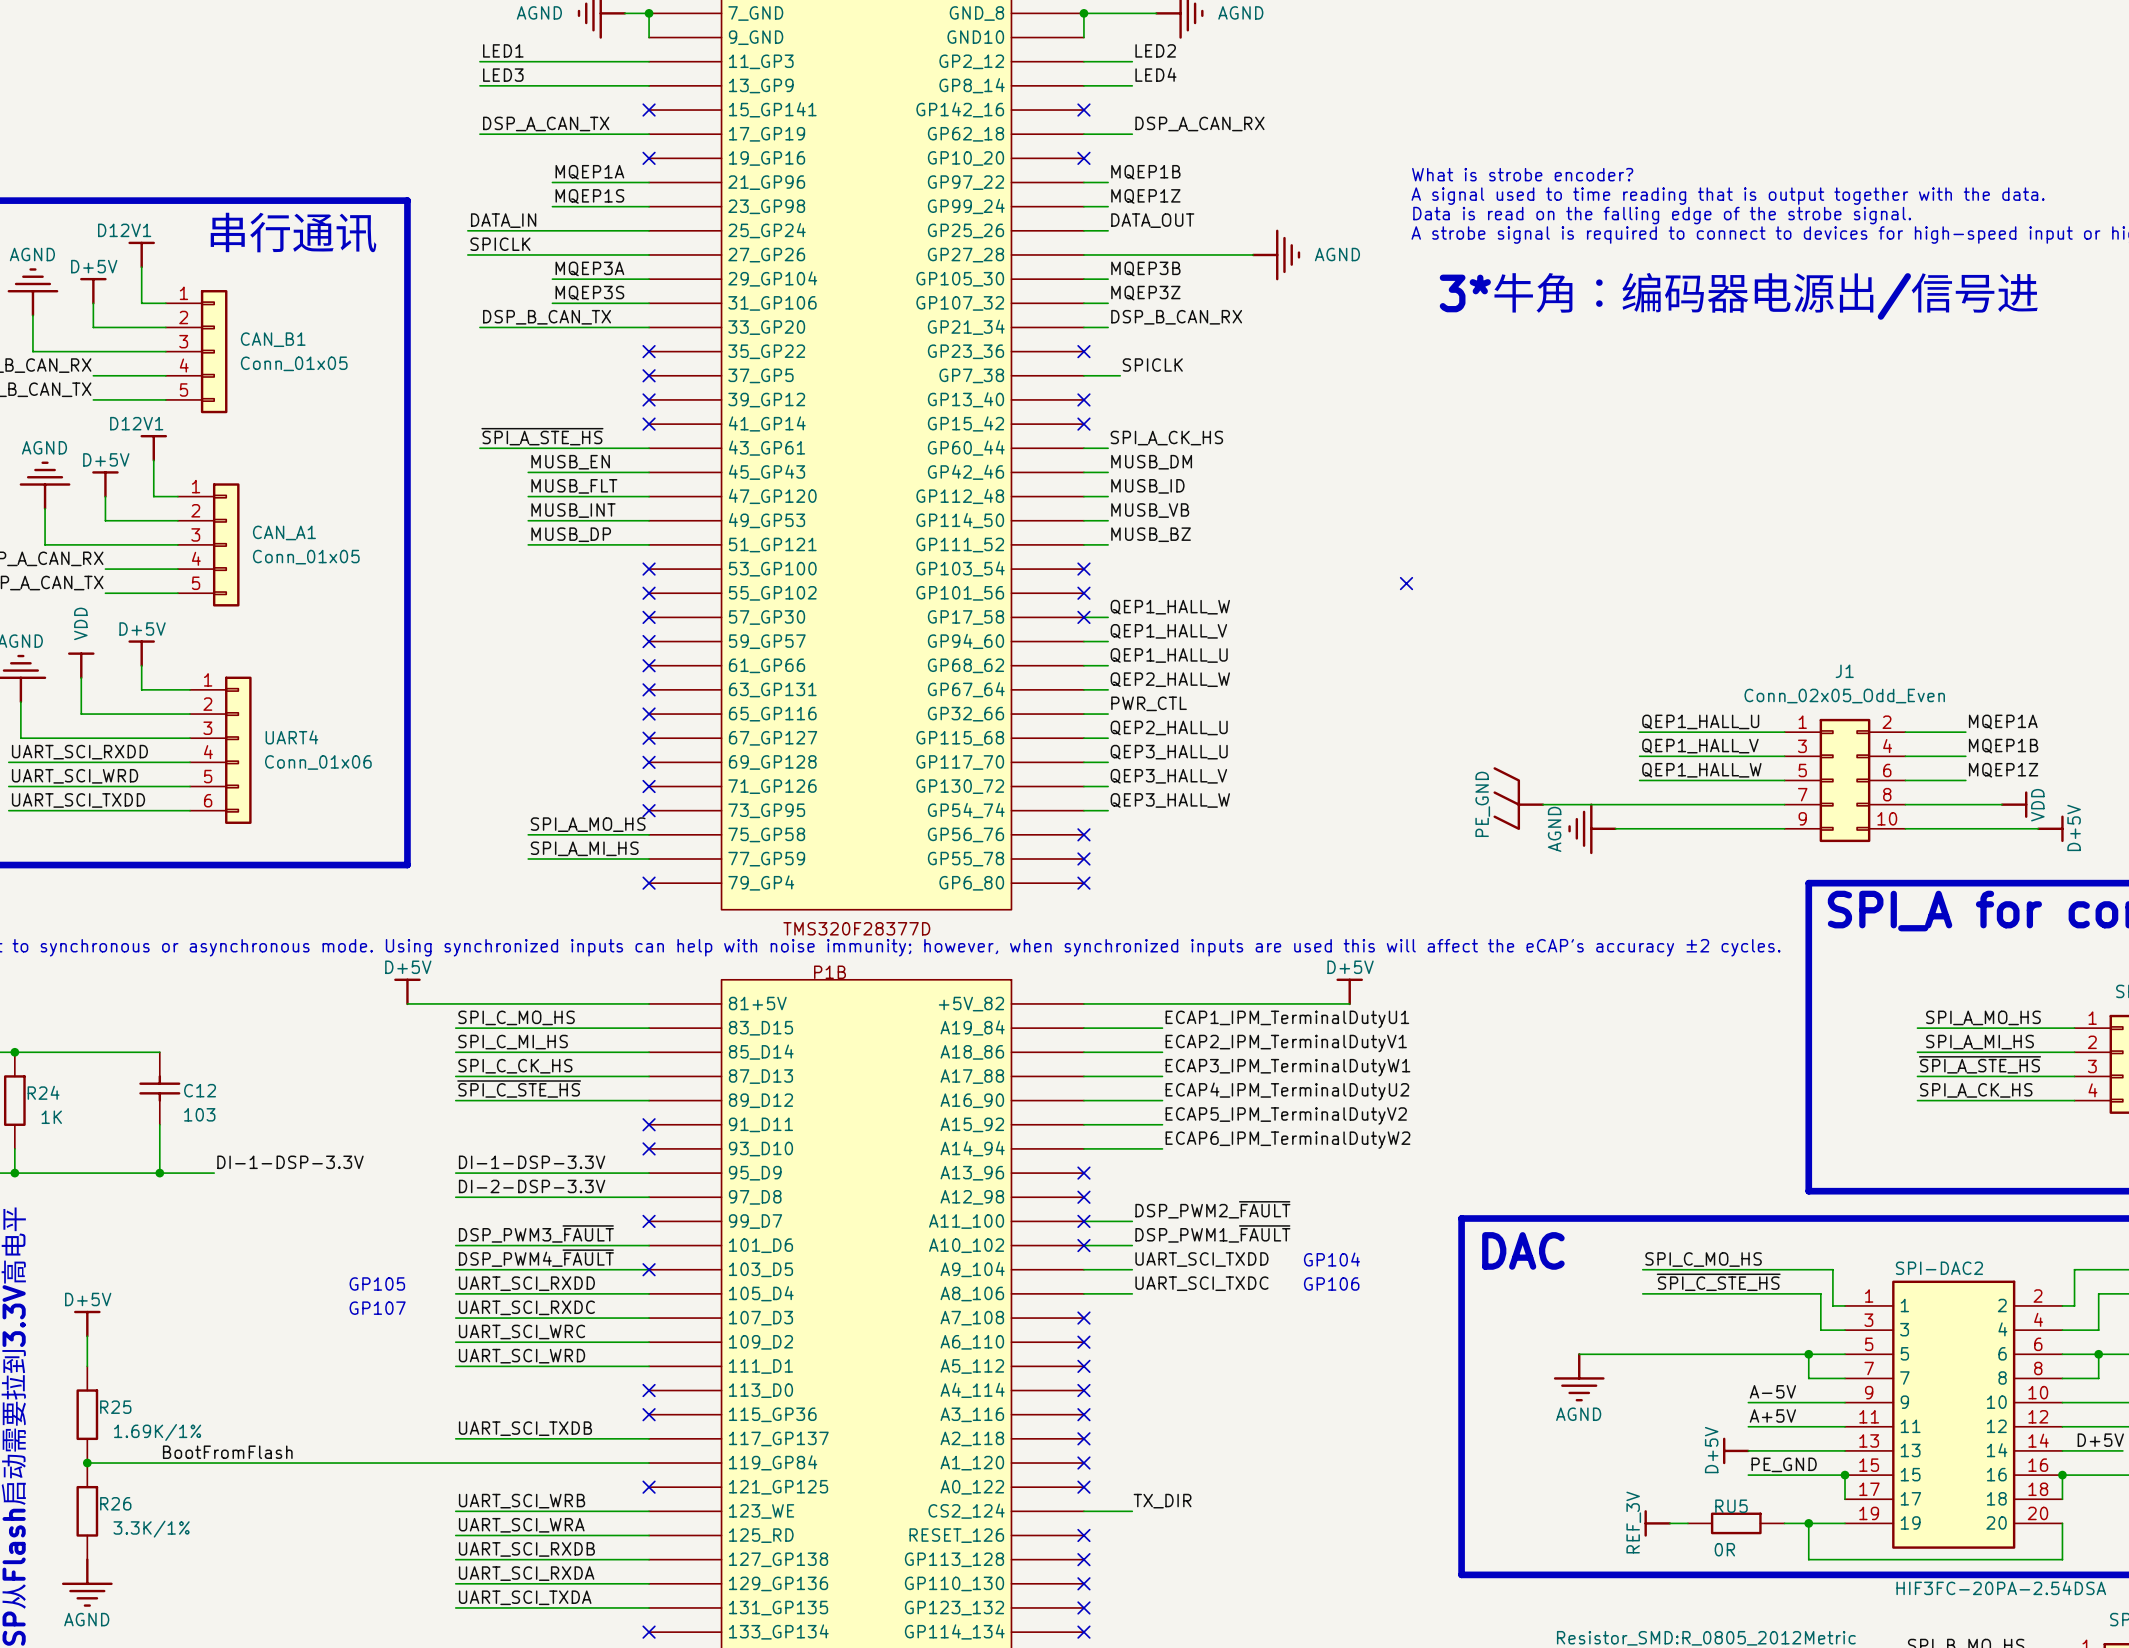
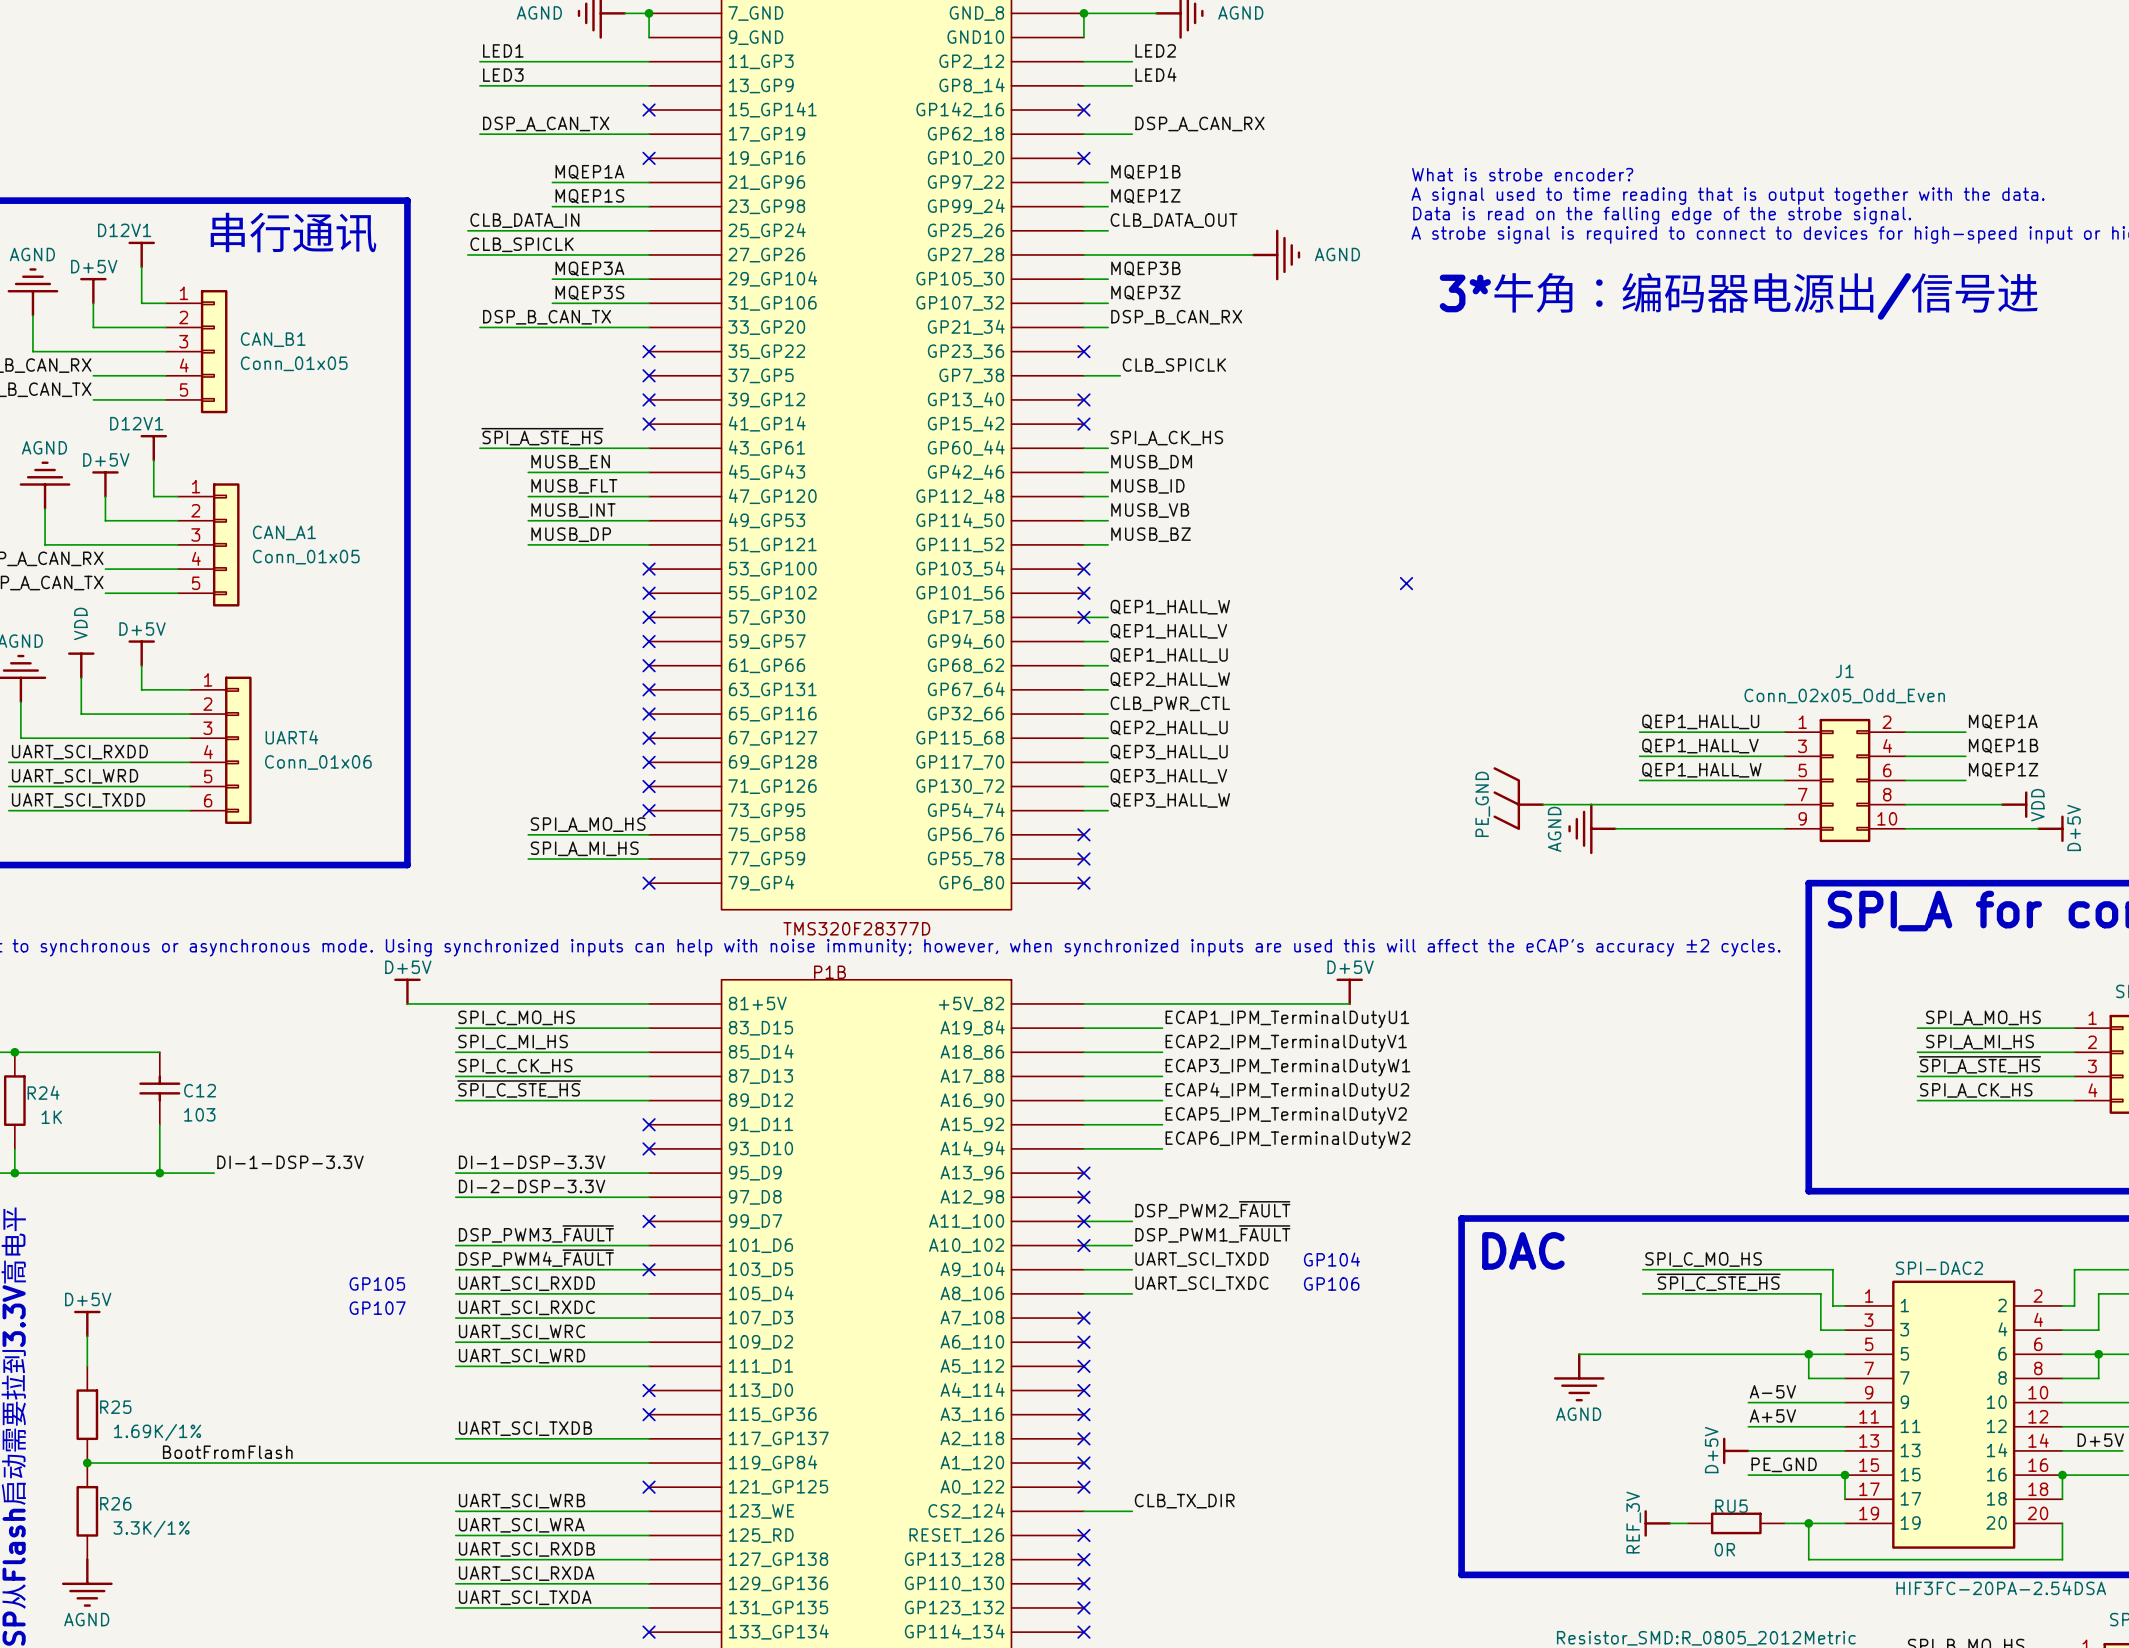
label: DATA_IN (503, 220) -> CLB_DATA_IN (524, 220)
label: DATA_OUT (1152, 220) -> CLB_DATA_OUT (1174, 220)
label: SPICLK (500, 244) -> CLB_SPICLK (522, 244)
label: SPICLK (1152, 365) -> CLB_SPICLK (1174, 365)
label: PWR_CTL (1149, 703) -> CLB_PWR_CTL (1170, 703)
label: TX_DIR (1162, 1501) -> CLB_TX_DIR (1184, 1501)

